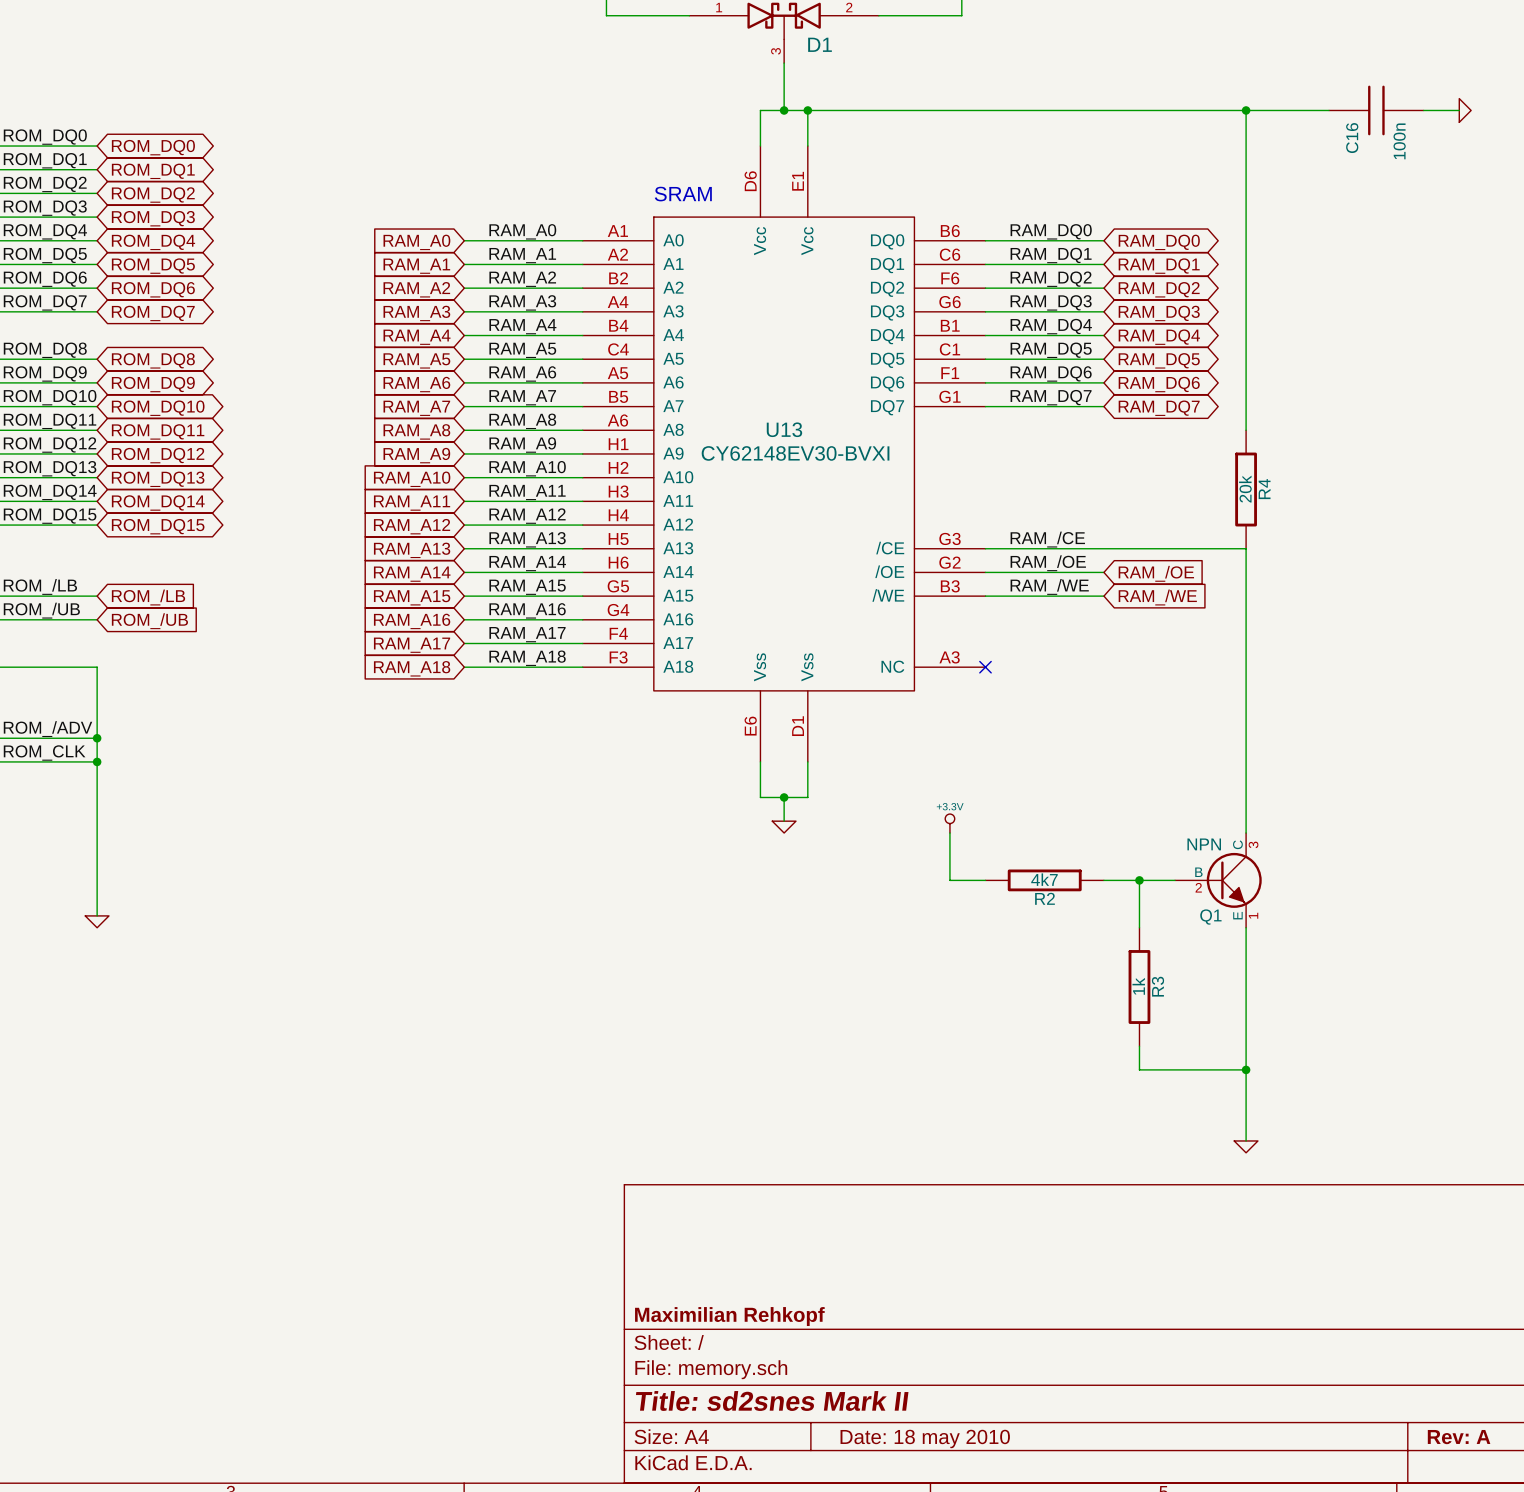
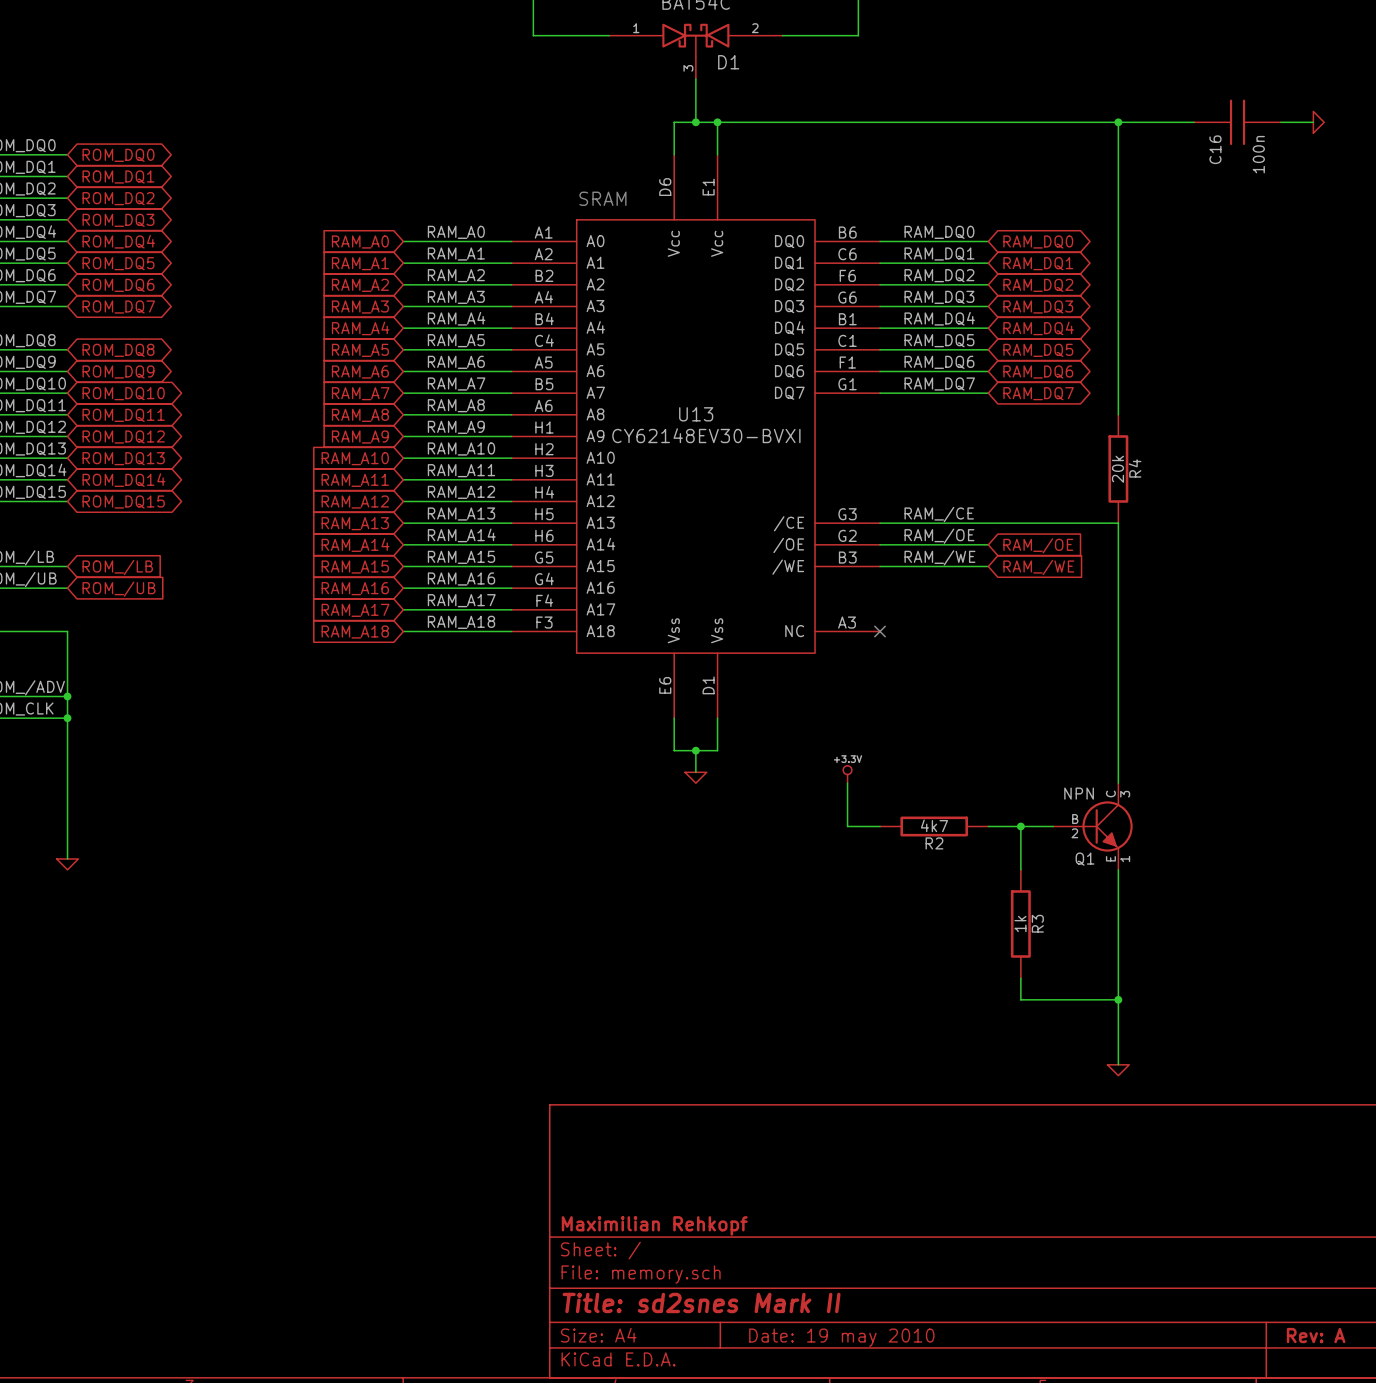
title block: Date: 18 may 2010 (925, 1438) -> Date: 19 may 2010 (841, 1337)

